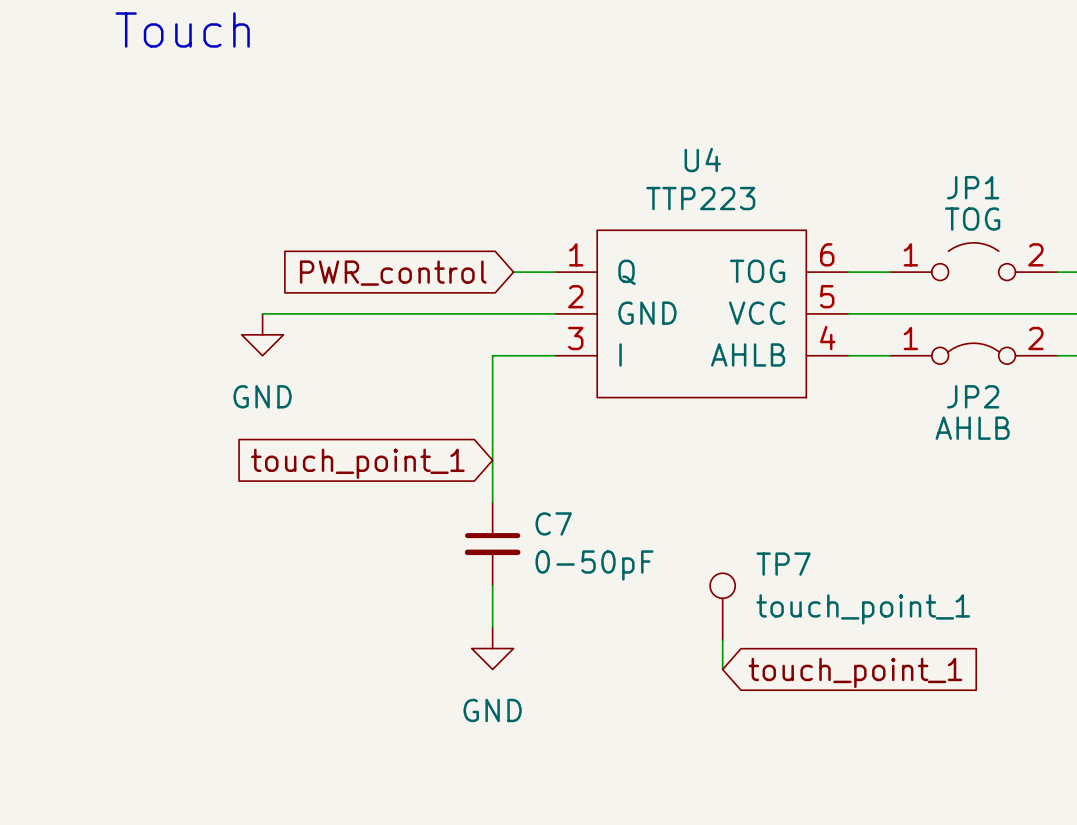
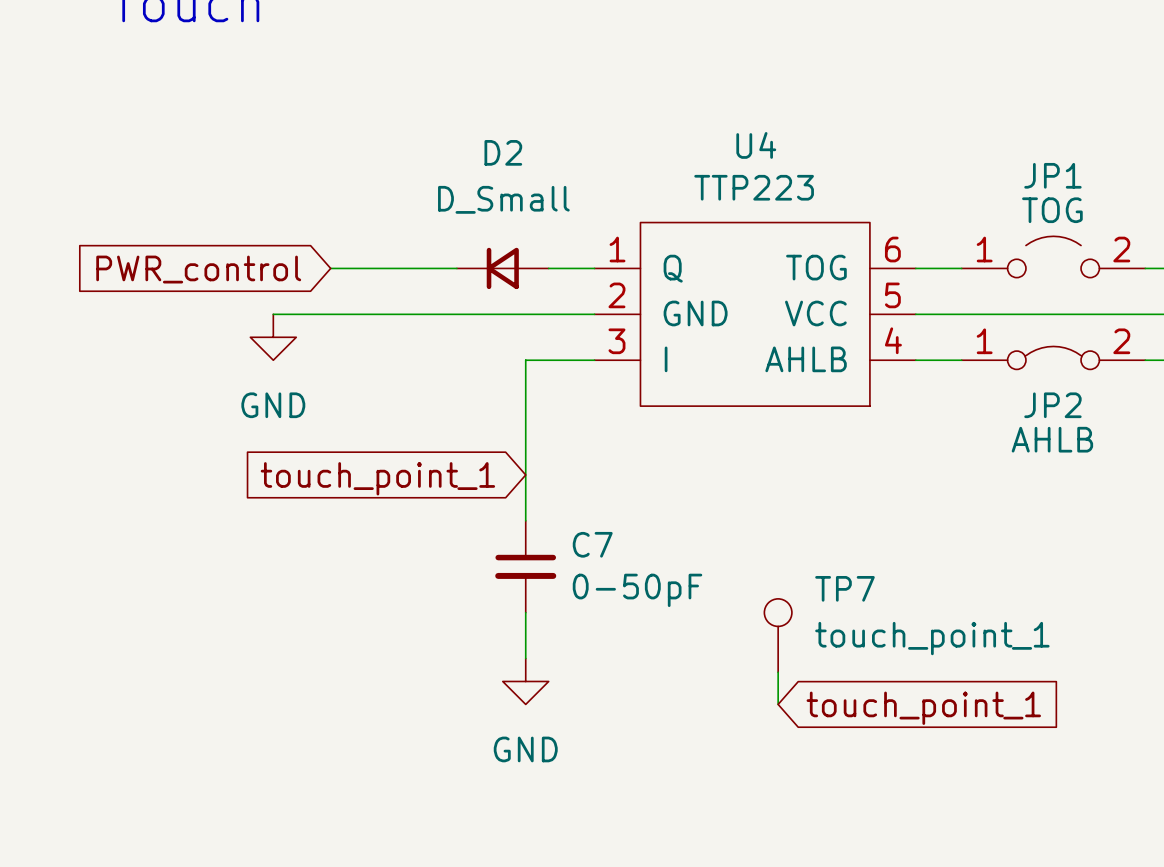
wire: none -> (330, 268) (456, 268)
D2: none -> D_Small (502, 268)
global label position: PWR_control (393, 273) -> PWR_control (198, 269)

